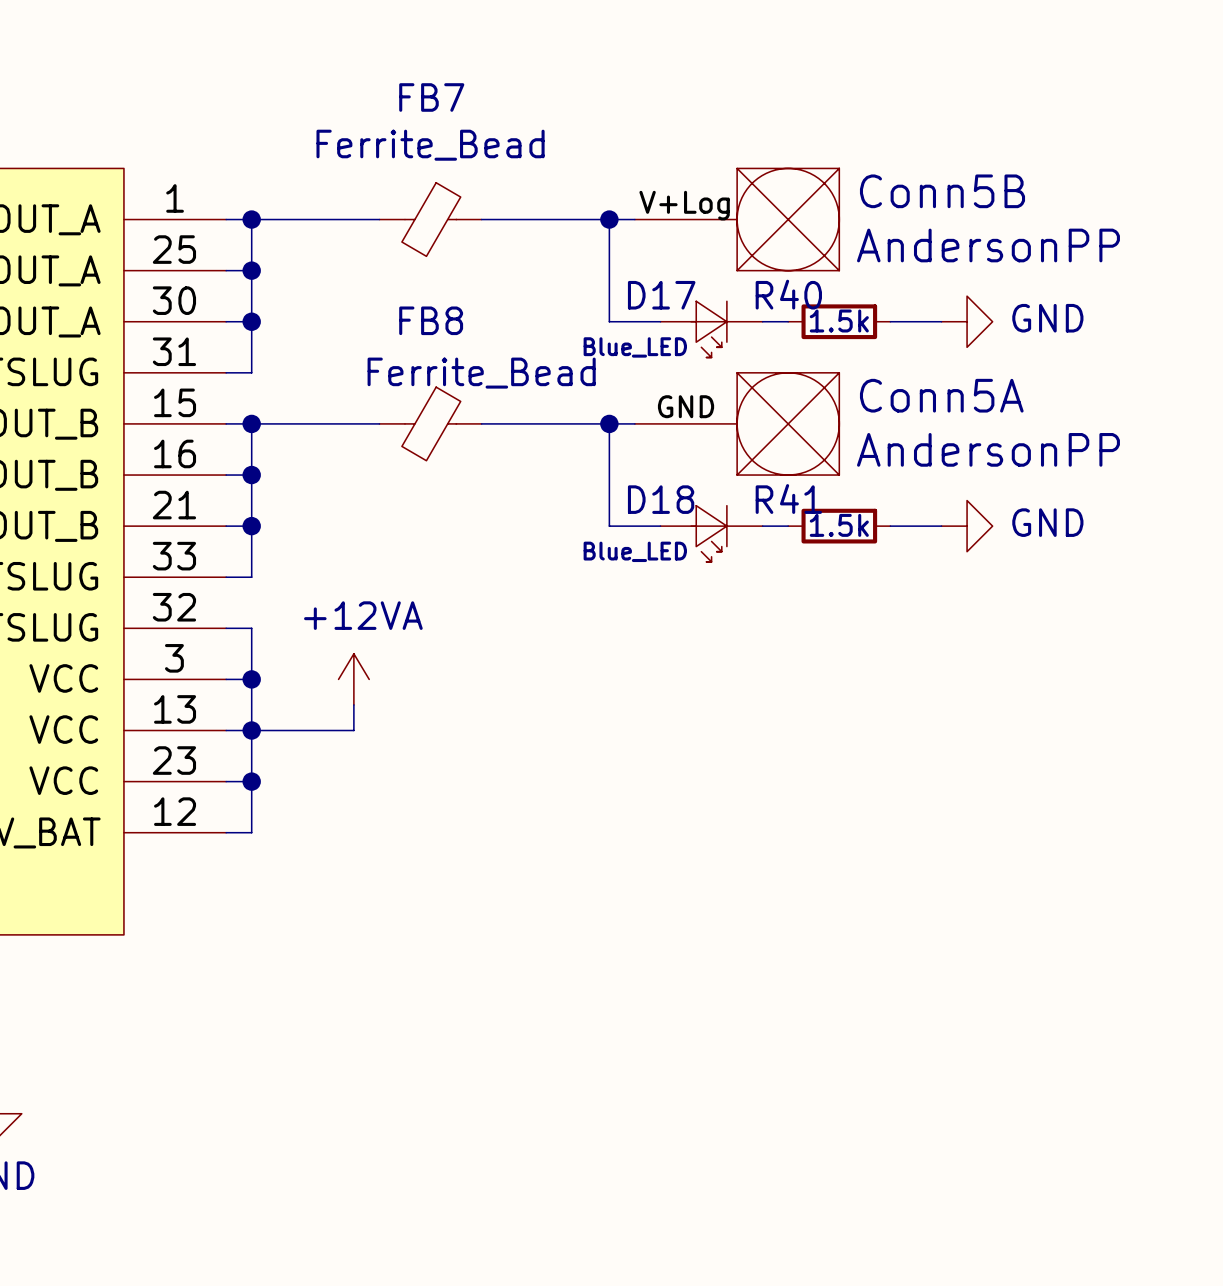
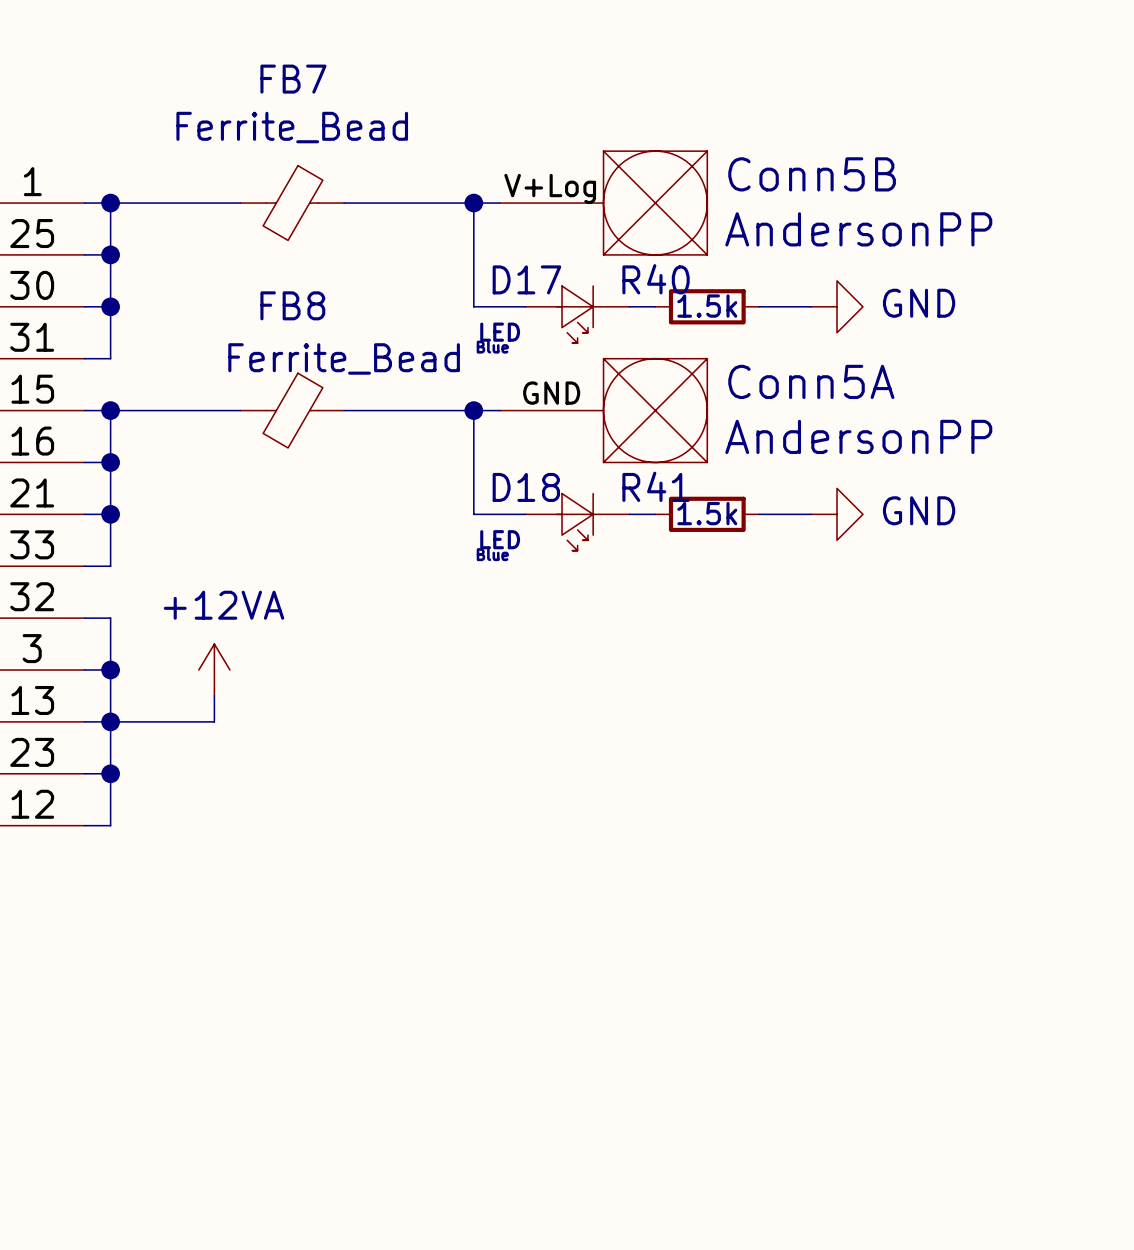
D17 value: Blue_LED (635, 347) -> LED (500, 332)
text: none -> Blue (492, 347)
D18 value: Blue_LED (635, 551) -> LED (500, 539)
text: none -> Blue (492, 554)

